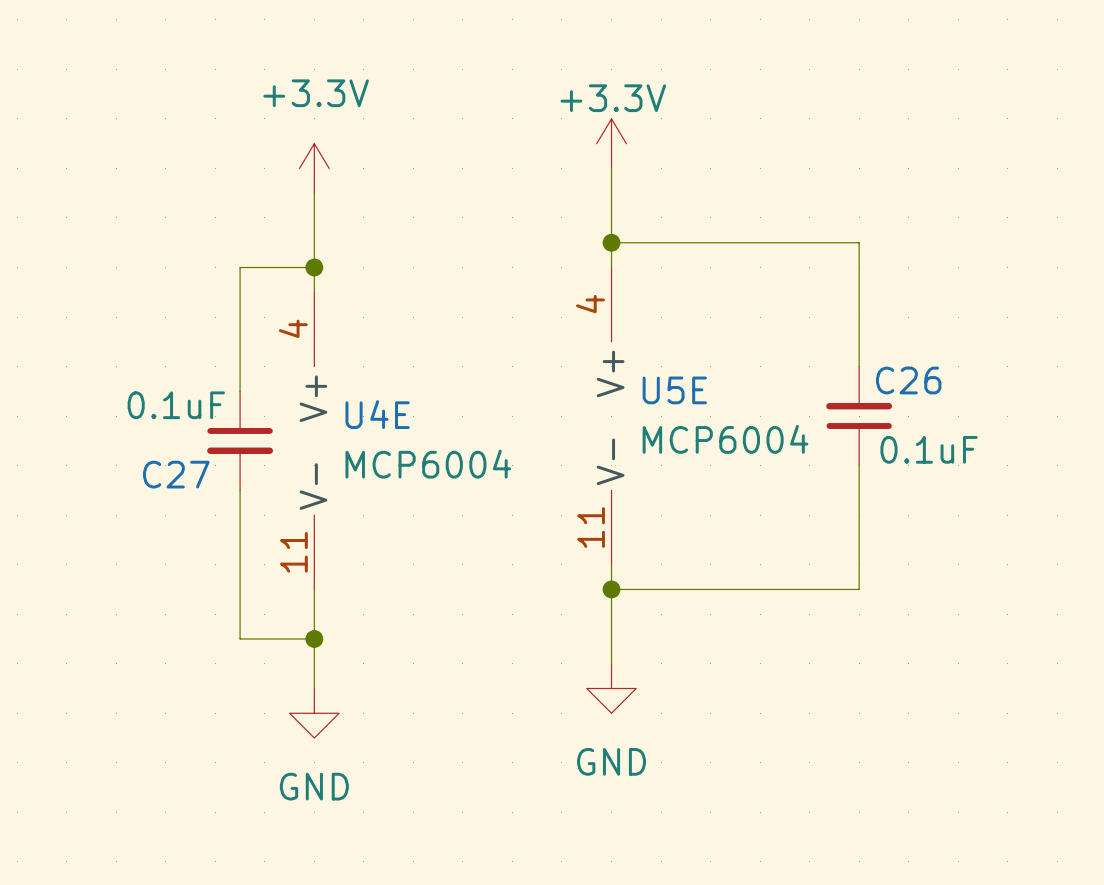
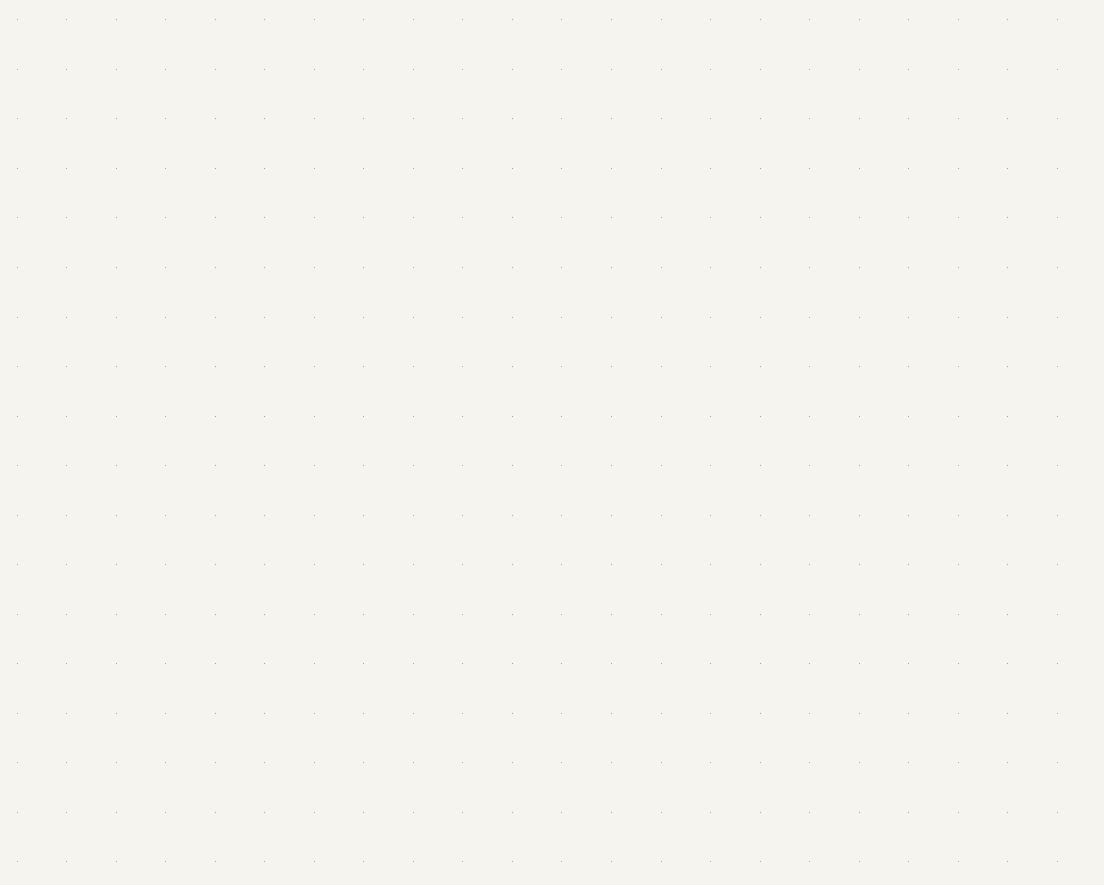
power symbol: +3.3V (611, 143) -> none
power symbol: +3.3V (314, 168) -> none
wire: (611, 168) (611, 267) -> none
wire: (314, 193) (314, 292) -> none
wire: (611, 242) (859, 242) (859, 366) -> none
junction: (611, 242) -> none
wire: (314, 267) (240, 267) (240, 391) -> none
junction: (314, 267) -> none
U5E: MCP6004 (611, 416) -> none
C26: 0.1uF (859, 416) -> none
C27: 0.1uF (240, 440) -> none
U4E: MCP6004 (314, 440) -> none
wire: (859, 465) (859, 589) (611, 589) -> none
wire: (240, 490) (240, 638) (314, 638) -> none
wire: (611, 564) (611, 663) -> none
wire: (314, 589) (314, 688) -> none
junction: (611, 589) -> none
junction: (314, 638) -> none
power symbol: GND (611, 688) -> none
power symbol: GND (314, 713) -> none

